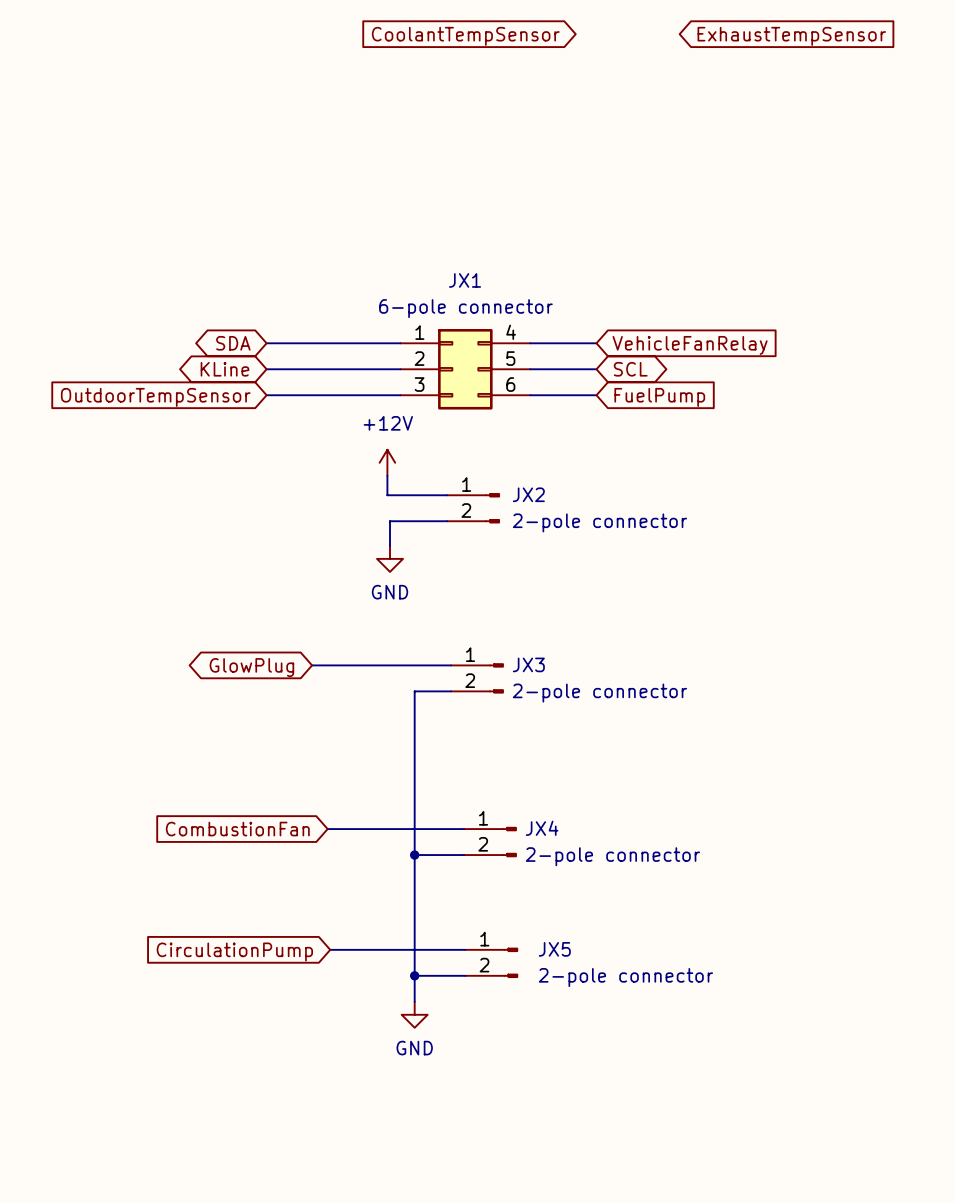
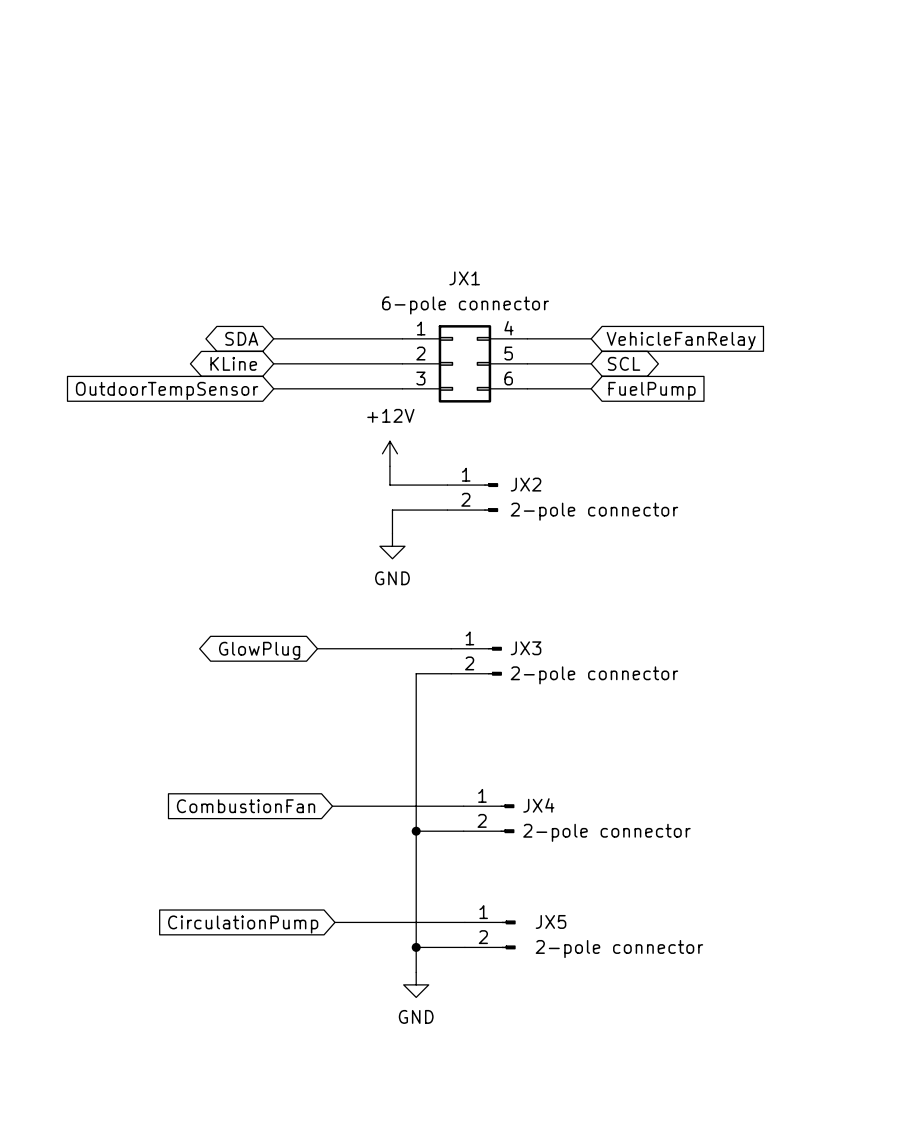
global label: CoolantTempSensor (465, 36) -> none
global label: ExhaustTempSensor (791, 36) -> none

